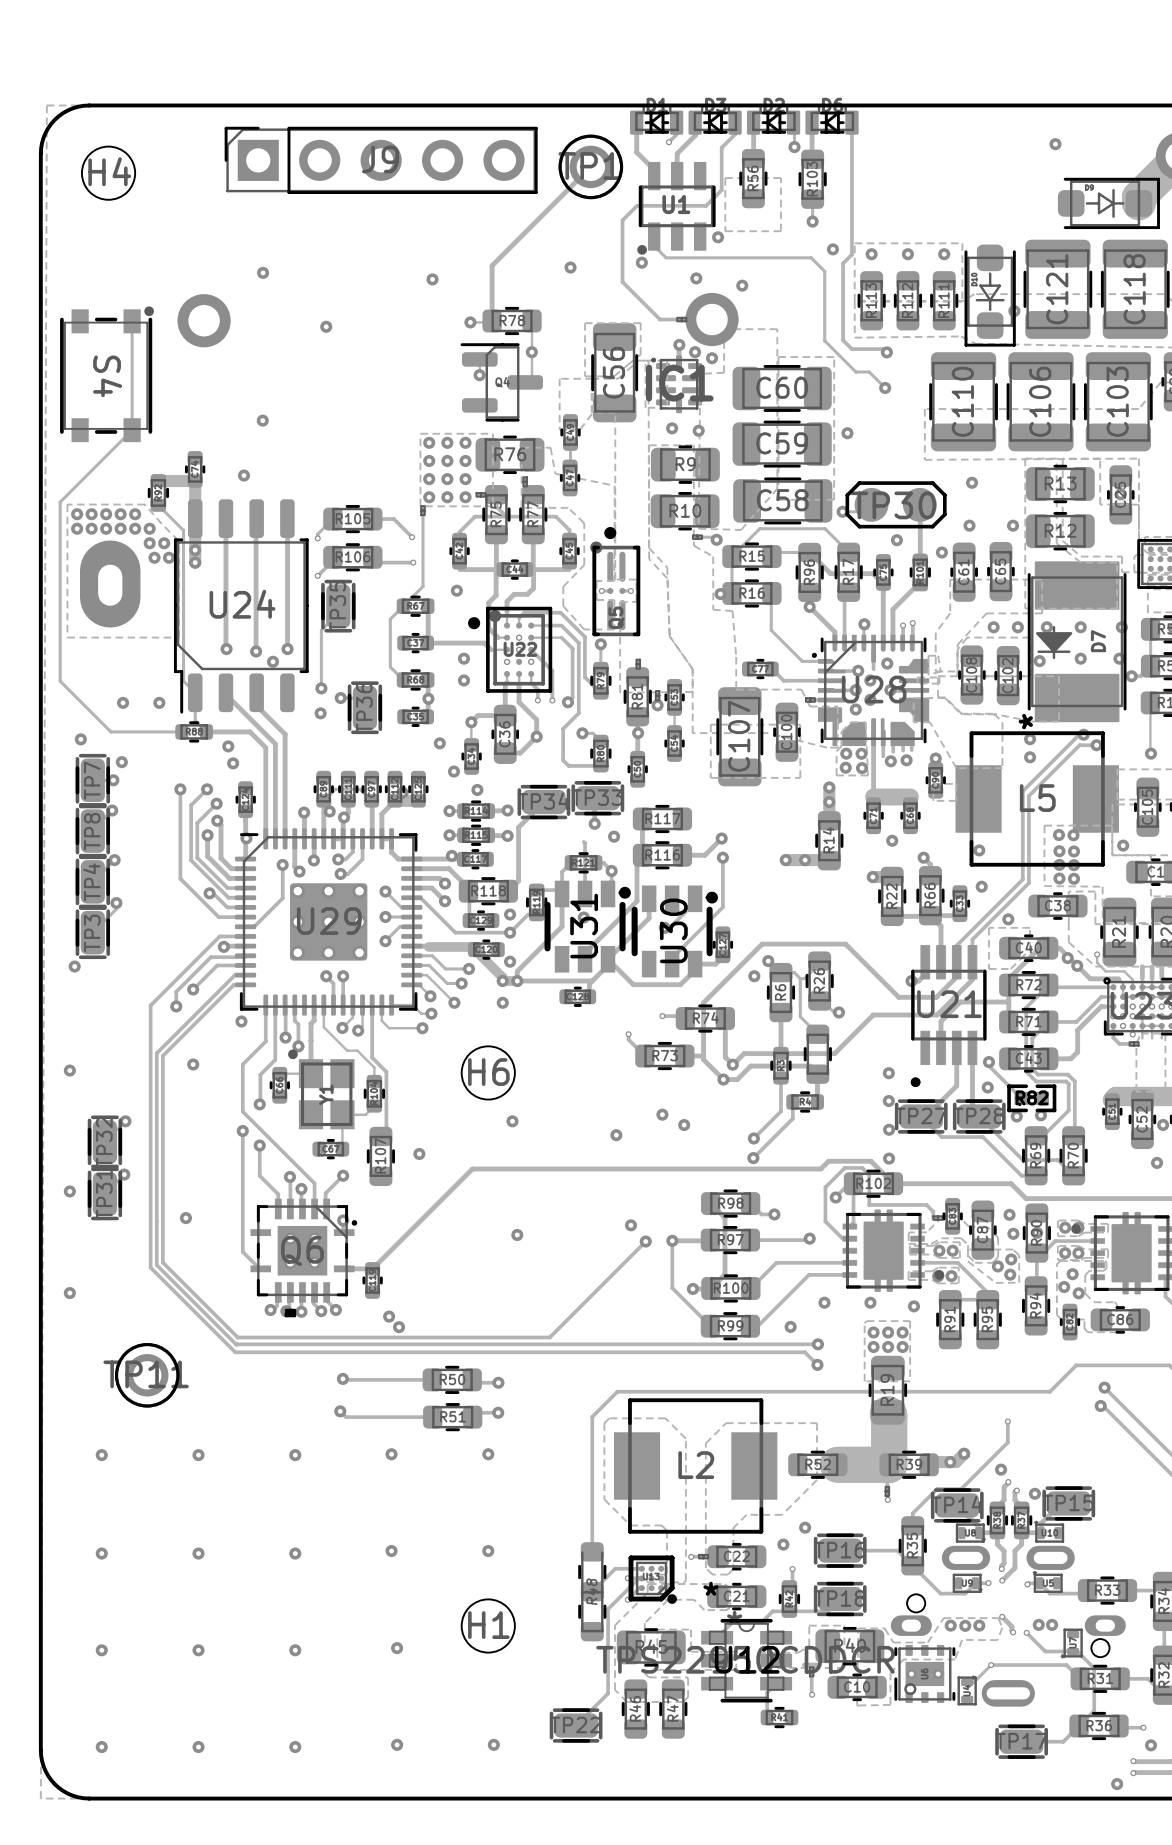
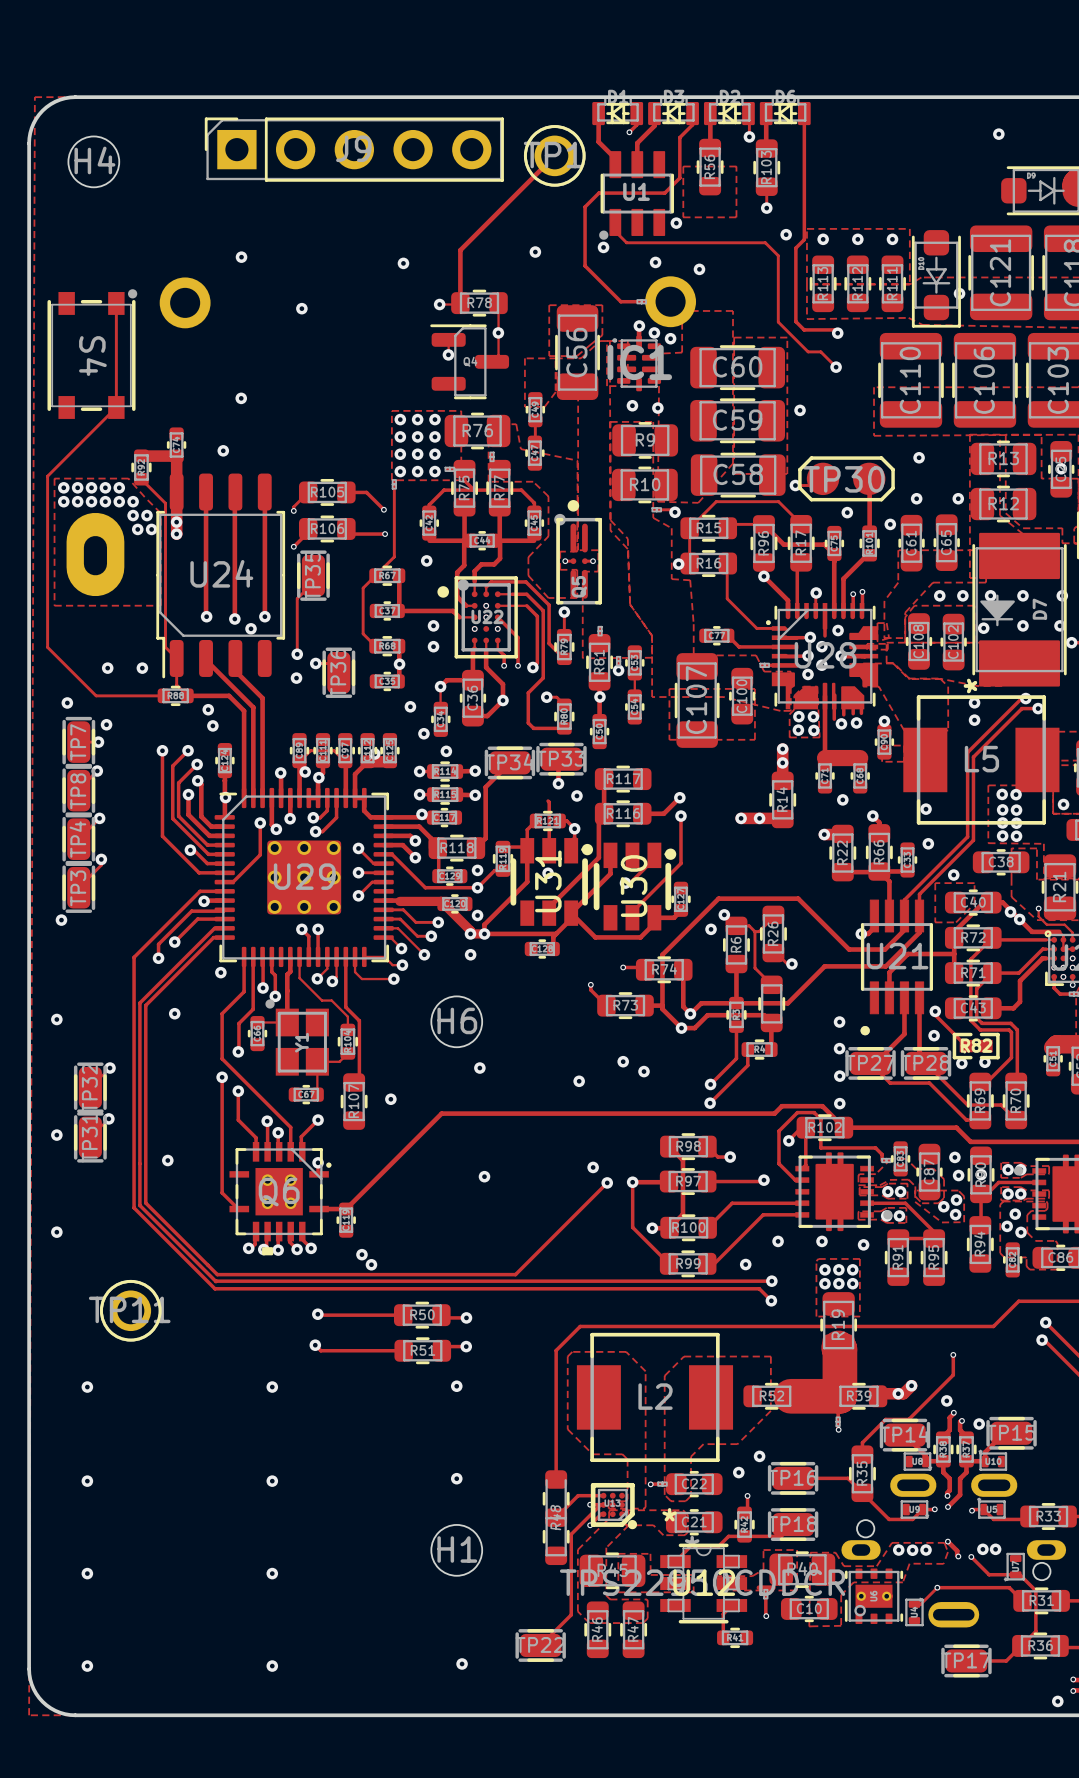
via: (391, 1454) -> none
via: (198, 1455) -> none
via: (391, 1551) -> none
via: (198, 1553) -> none
via: (397, 1648) -> none
via: (198, 1650) -> none
via: (397, 1744) -> none
via: (198, 1747) -> none

